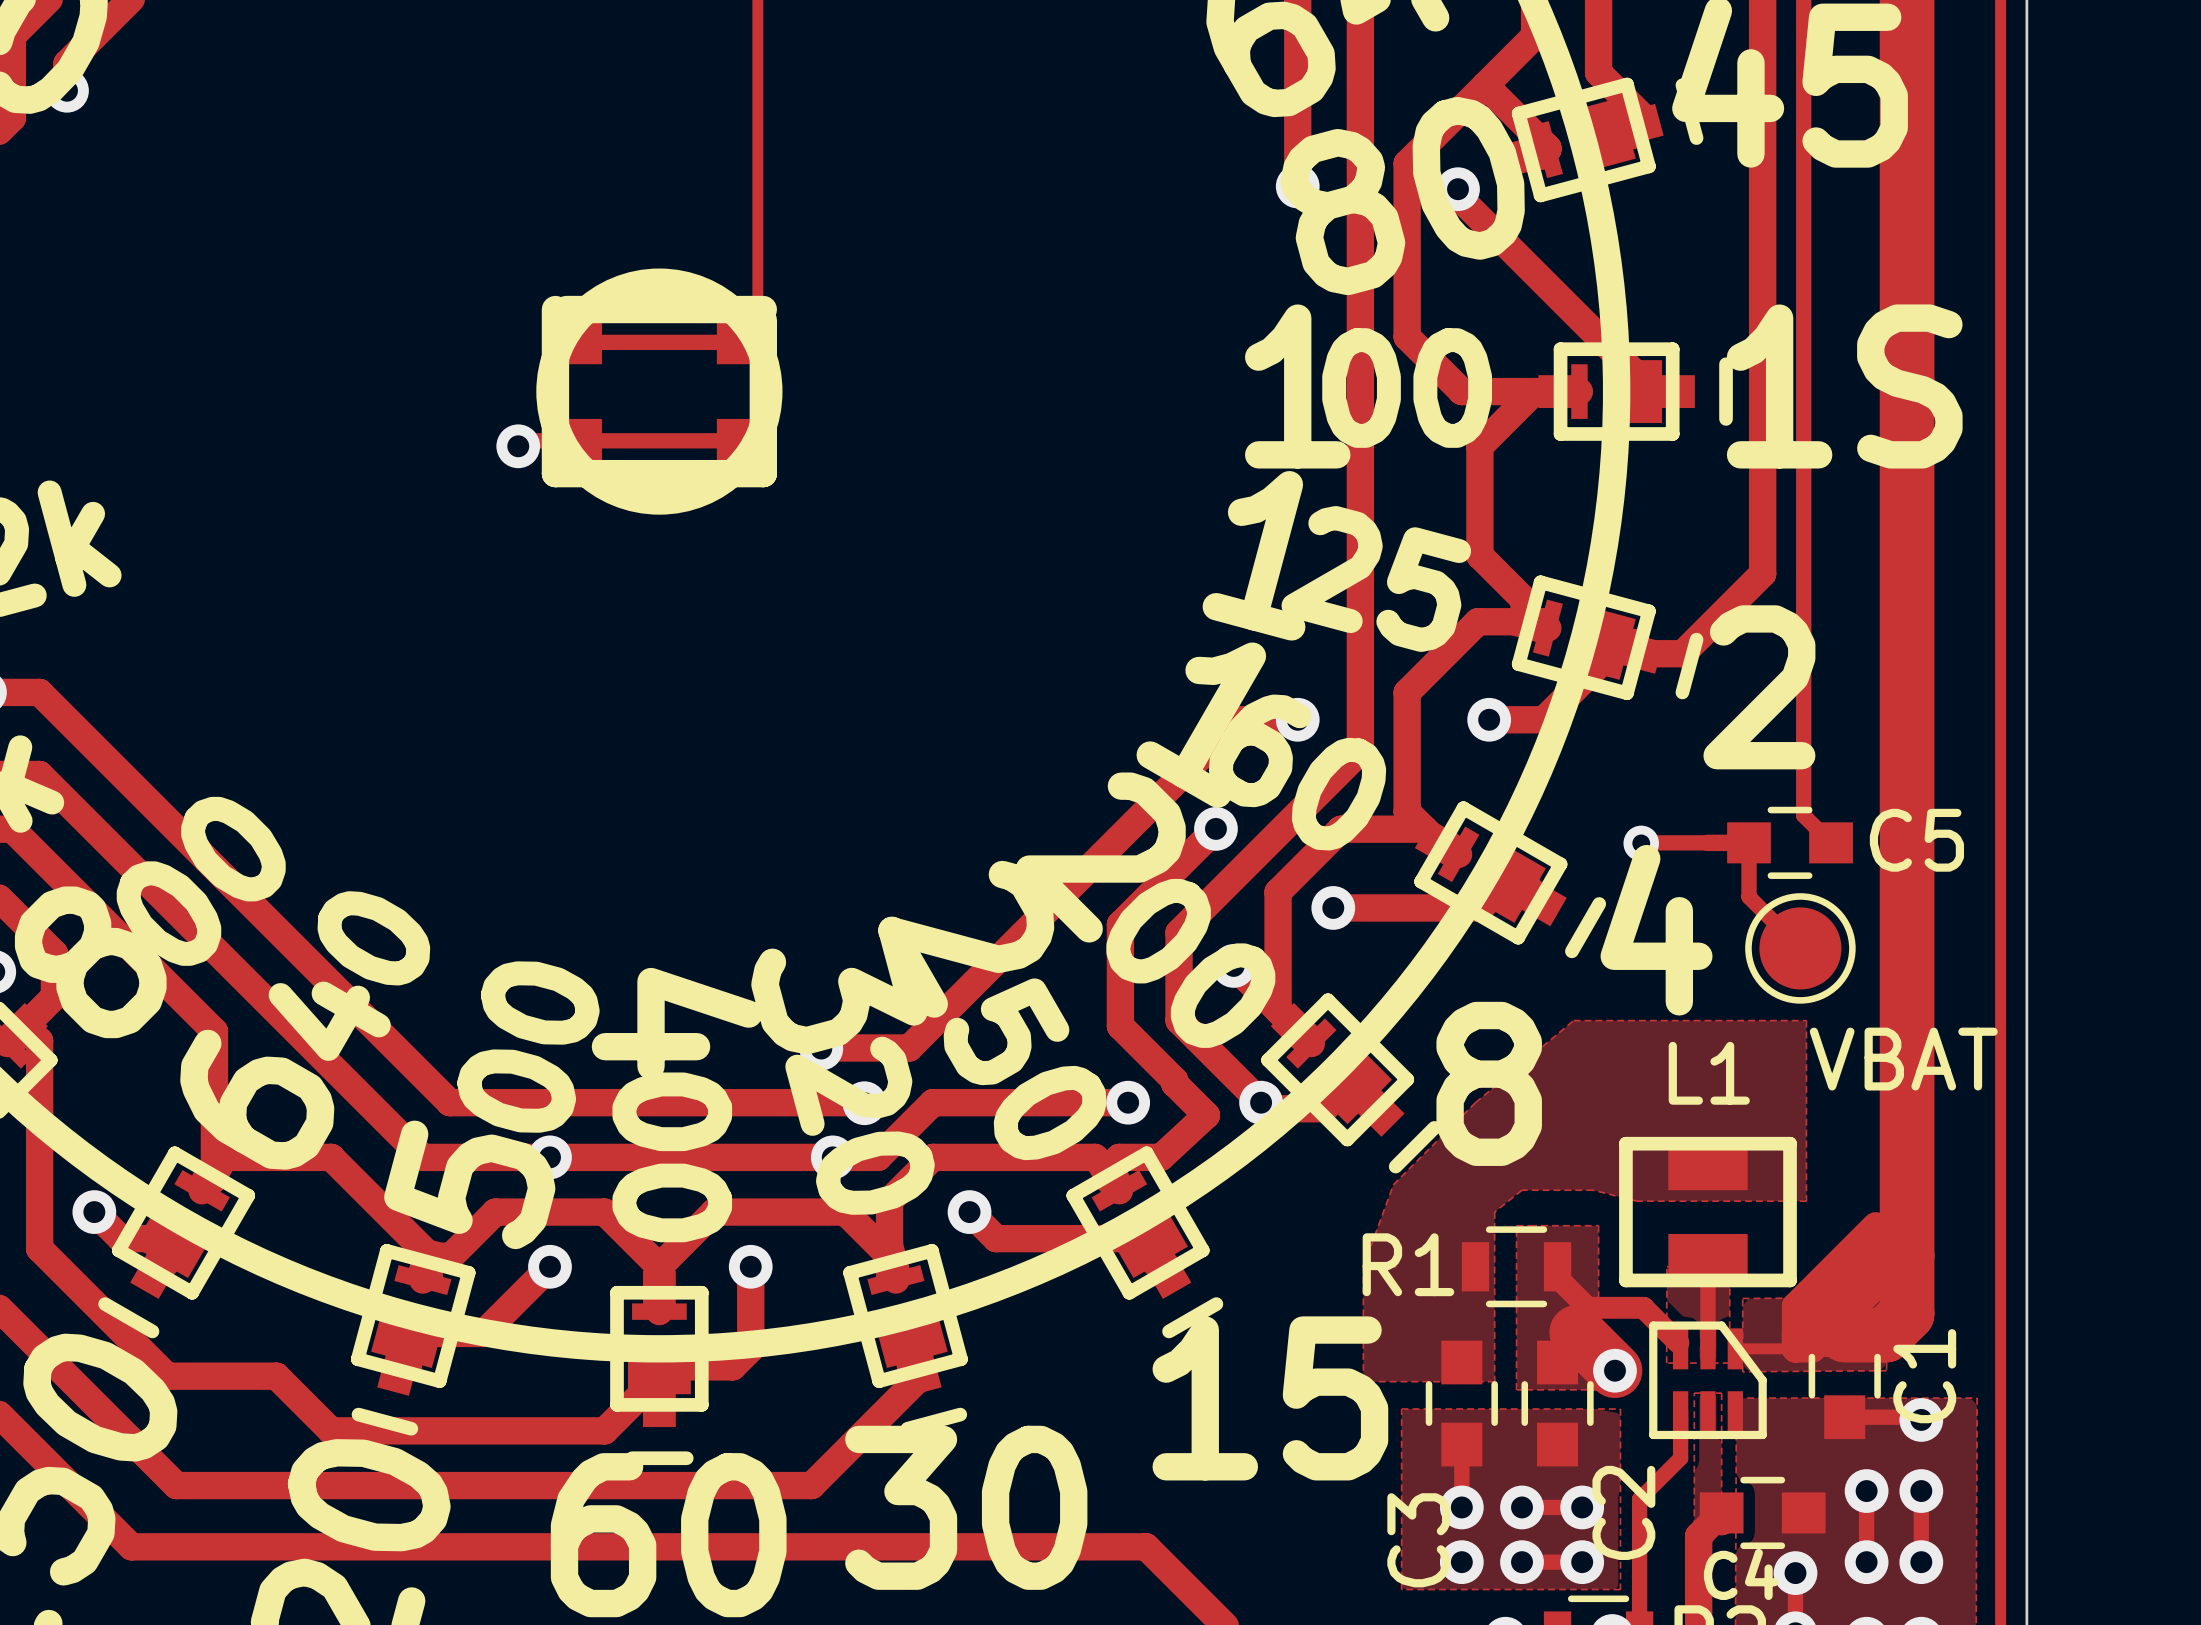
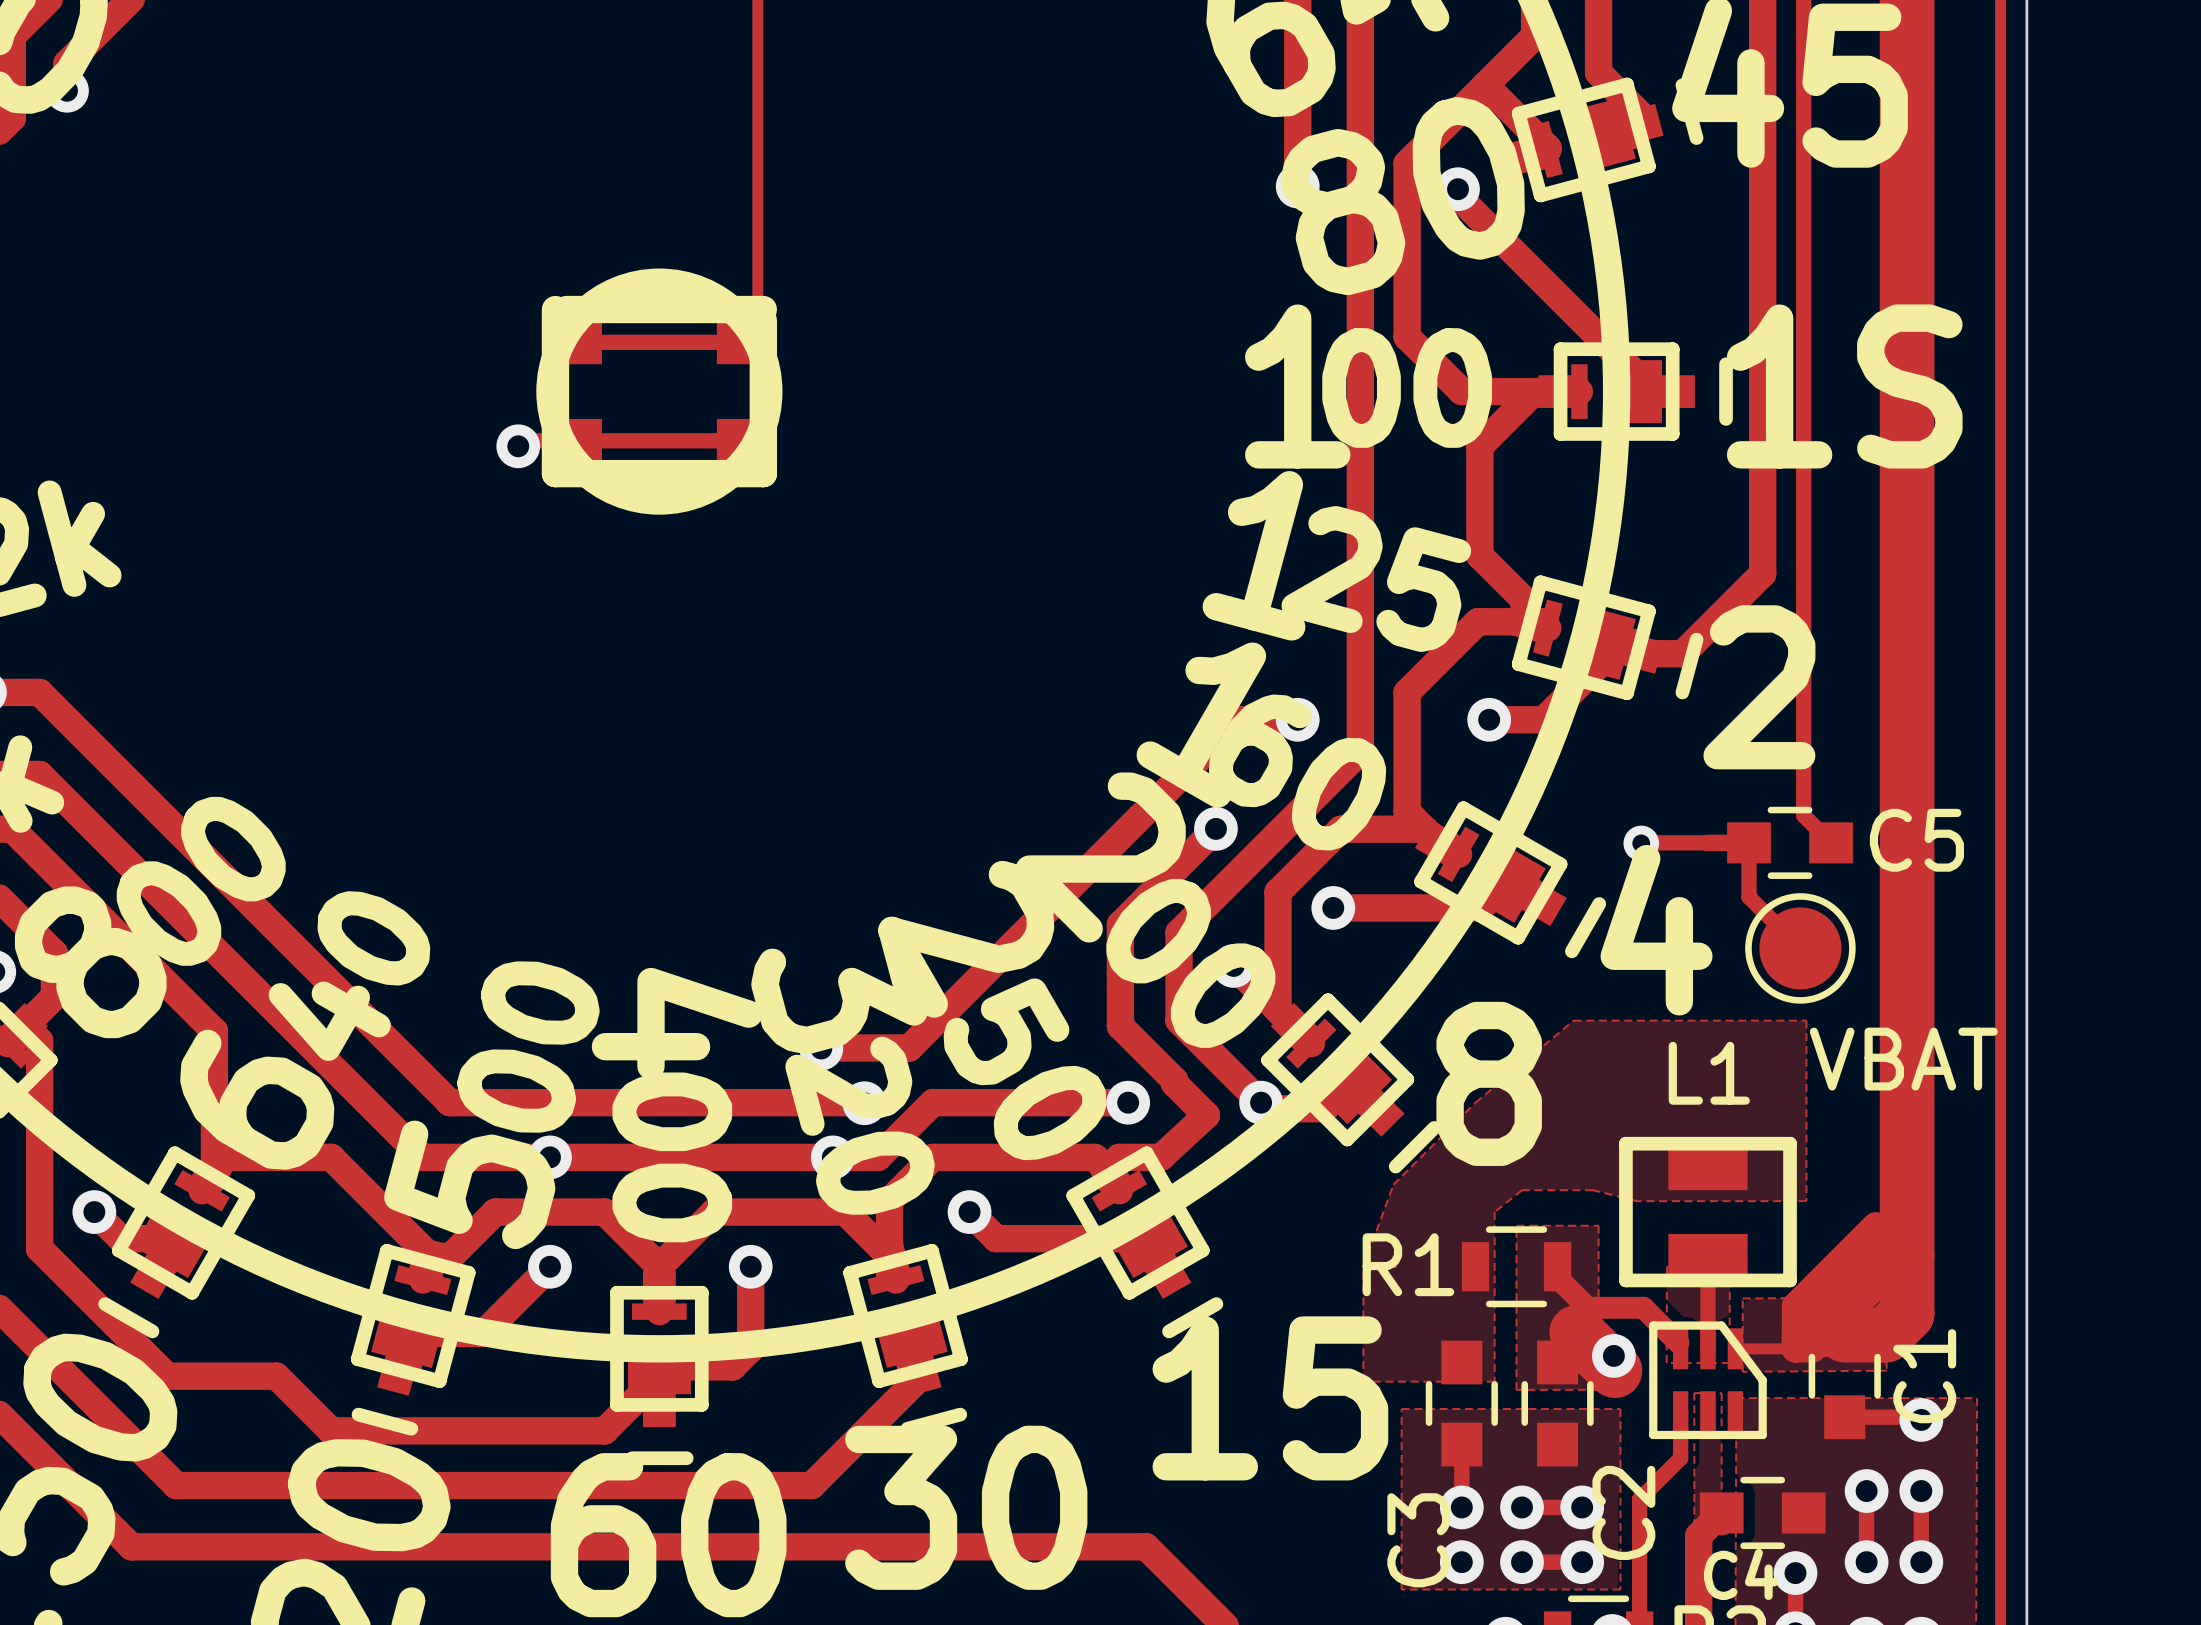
via position: (1614, 1370) -> (1613, 1355)

